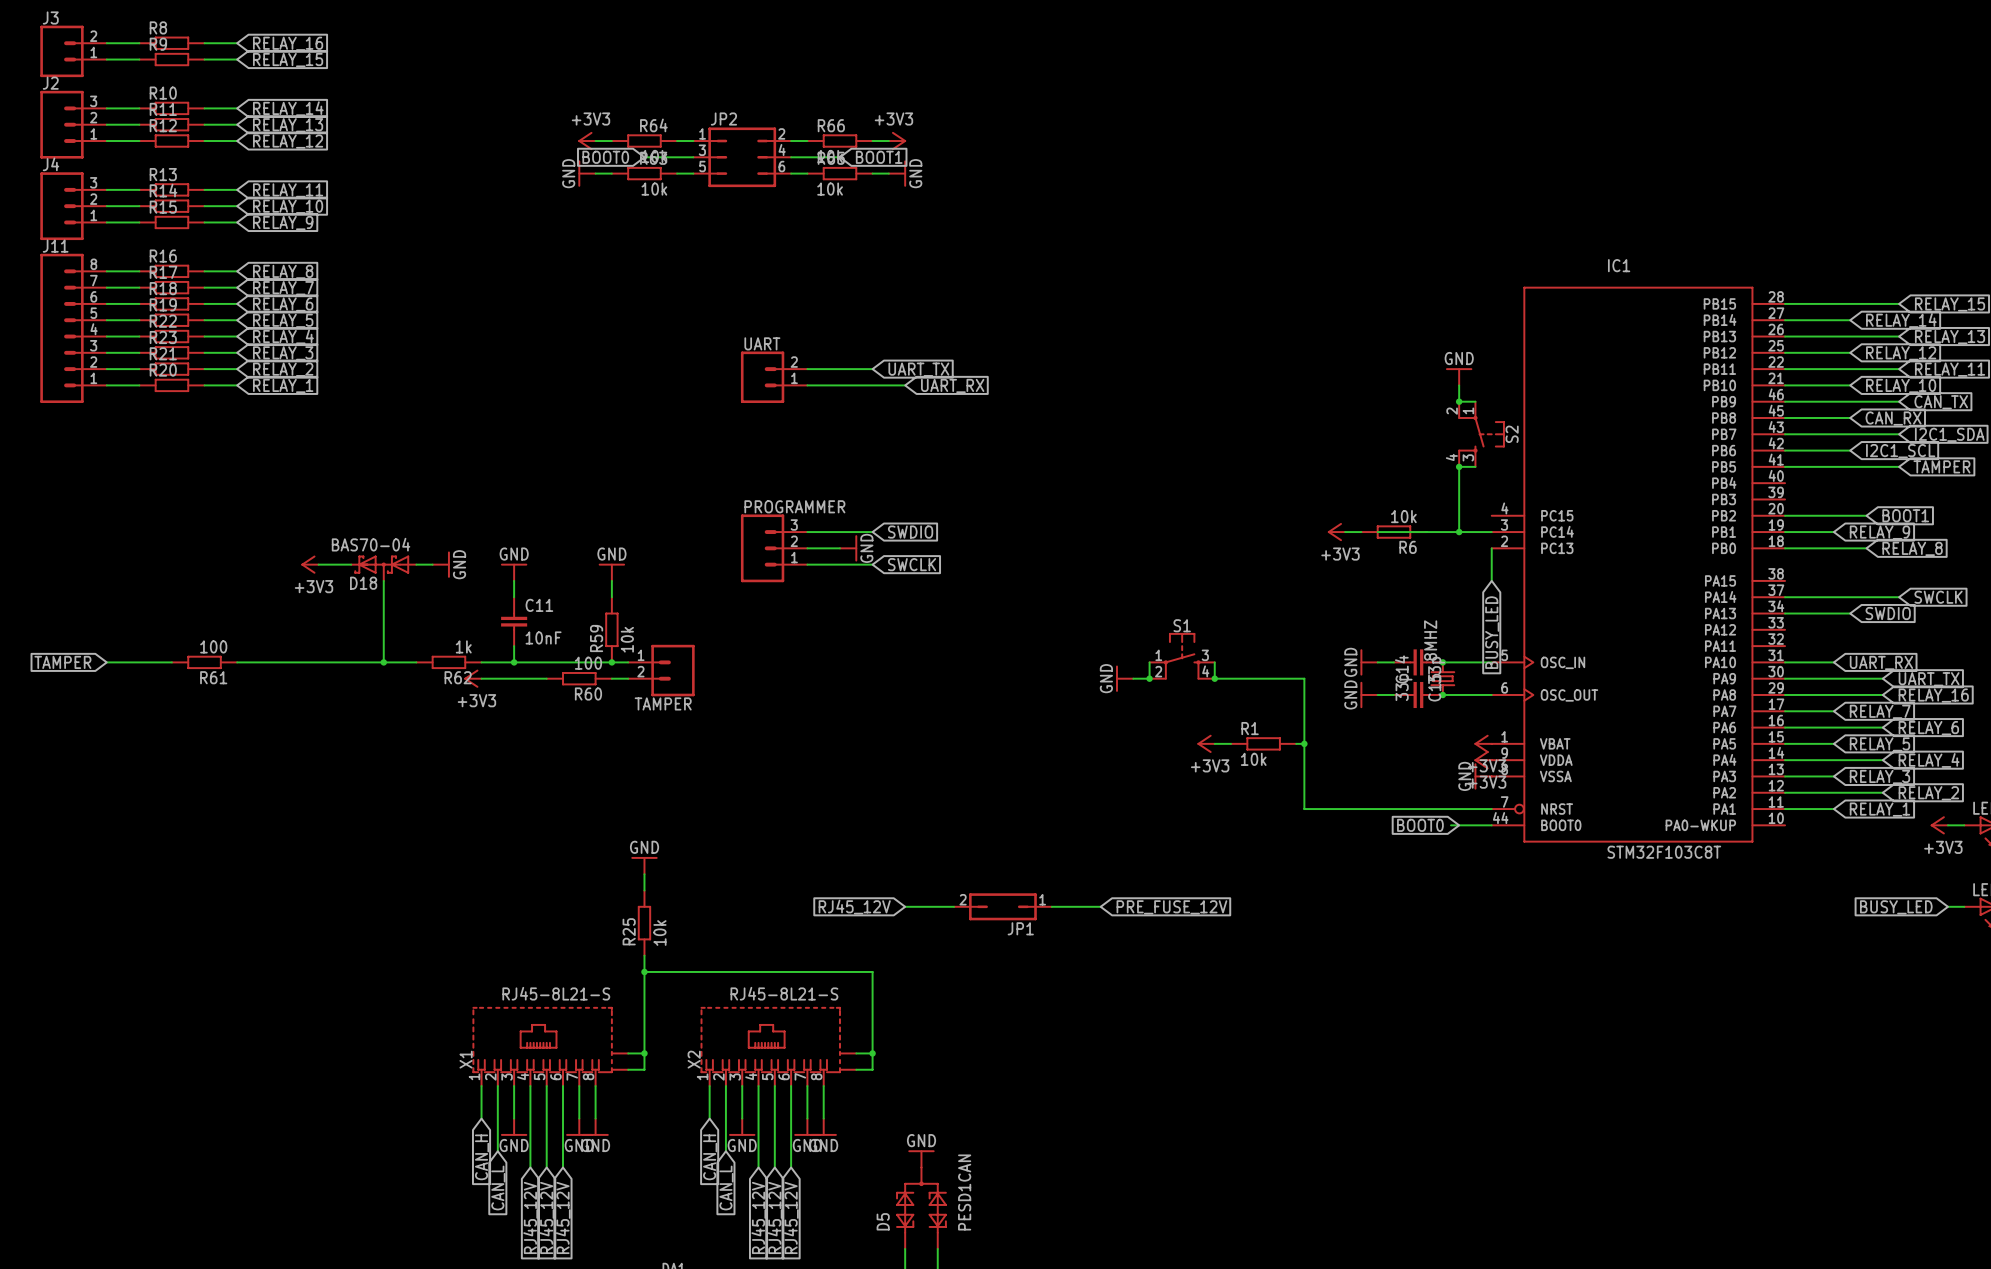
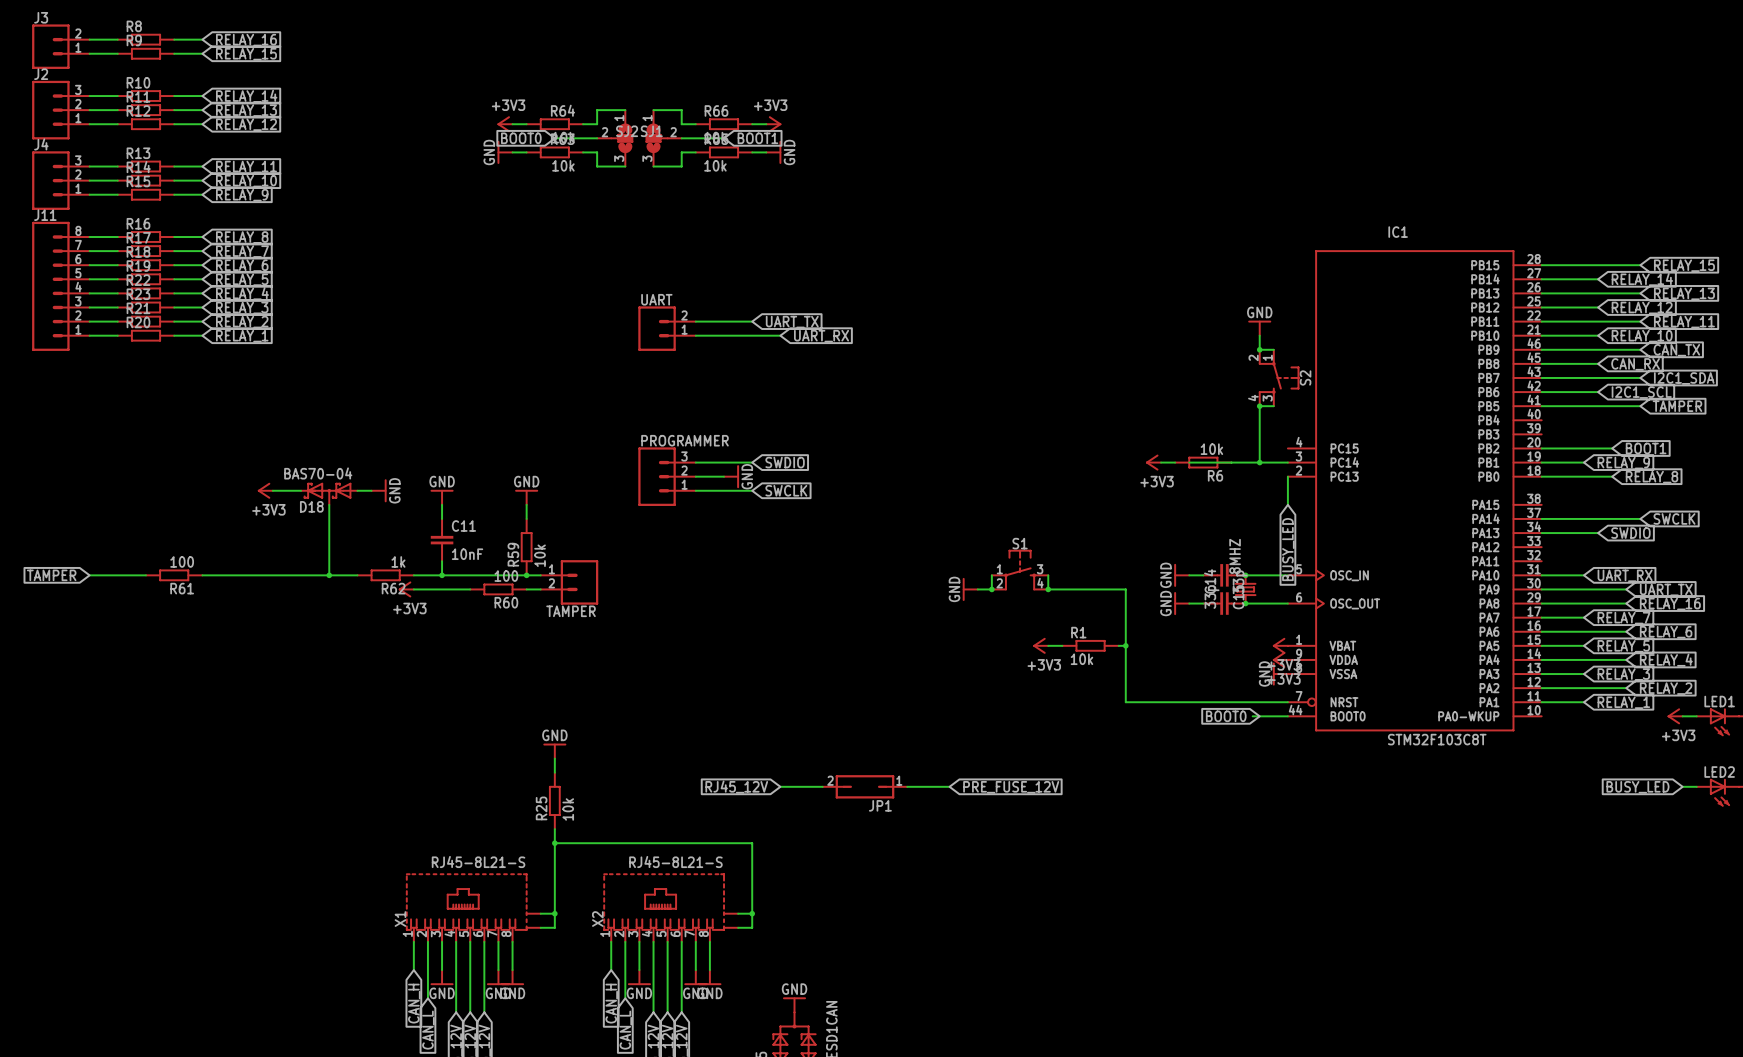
wire: none -> (625, 110) (597, 110) (597, 124)
wire: none -> (653, 110) (681, 110) (681, 124)
SJ1: none -> (614, 138)
JP2: (742, 157) -> none
SJ2: none -> (663, 138)
wire: none -> (597, 152) (597, 166) (625, 166)
wire: none -> (681, 152) (681, 166) (653, 166)

